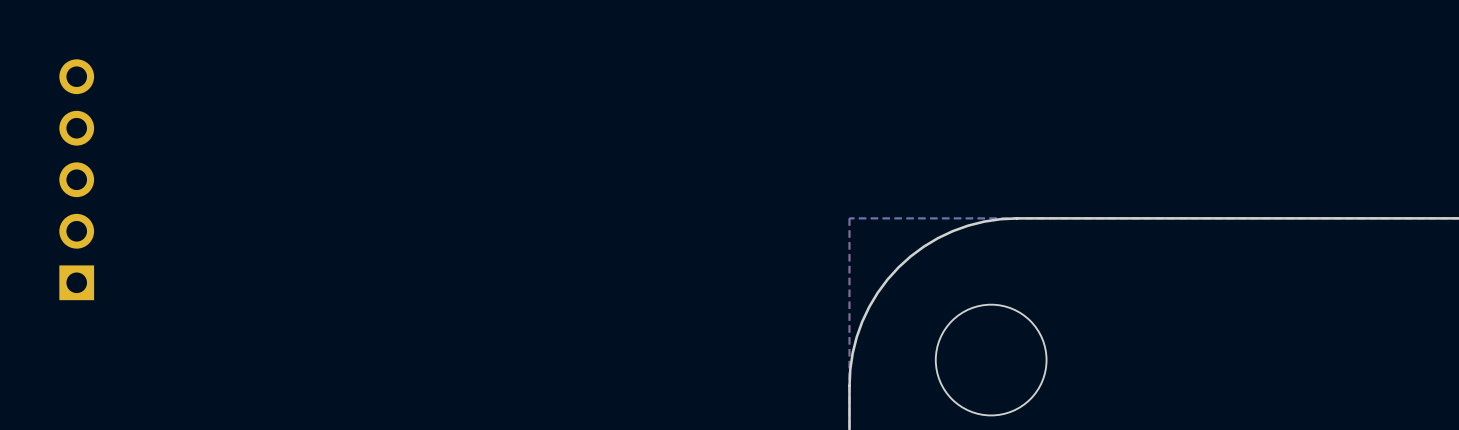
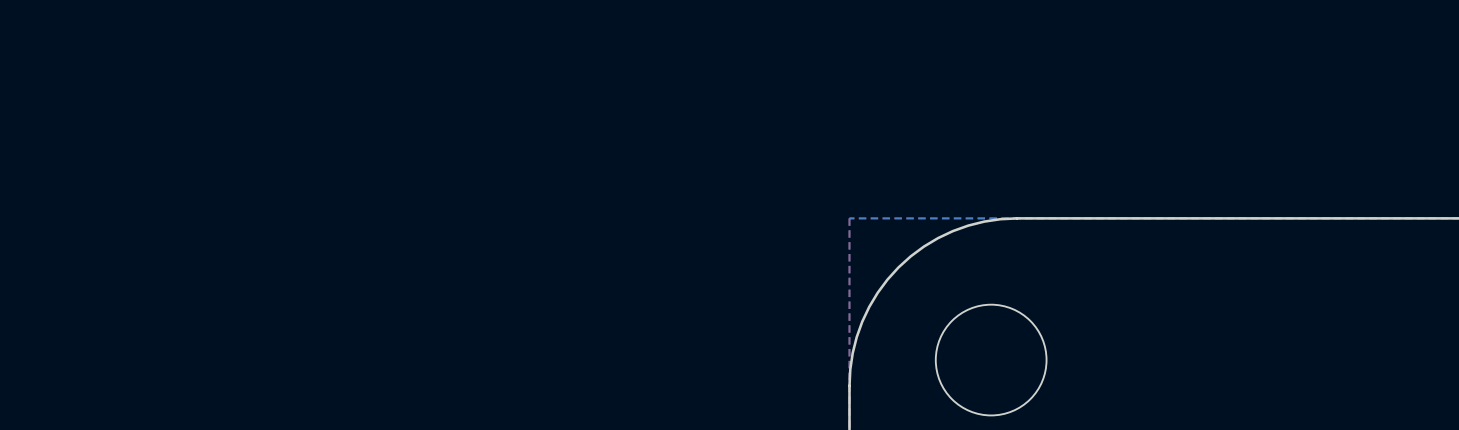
part: (76, 179) -> none

